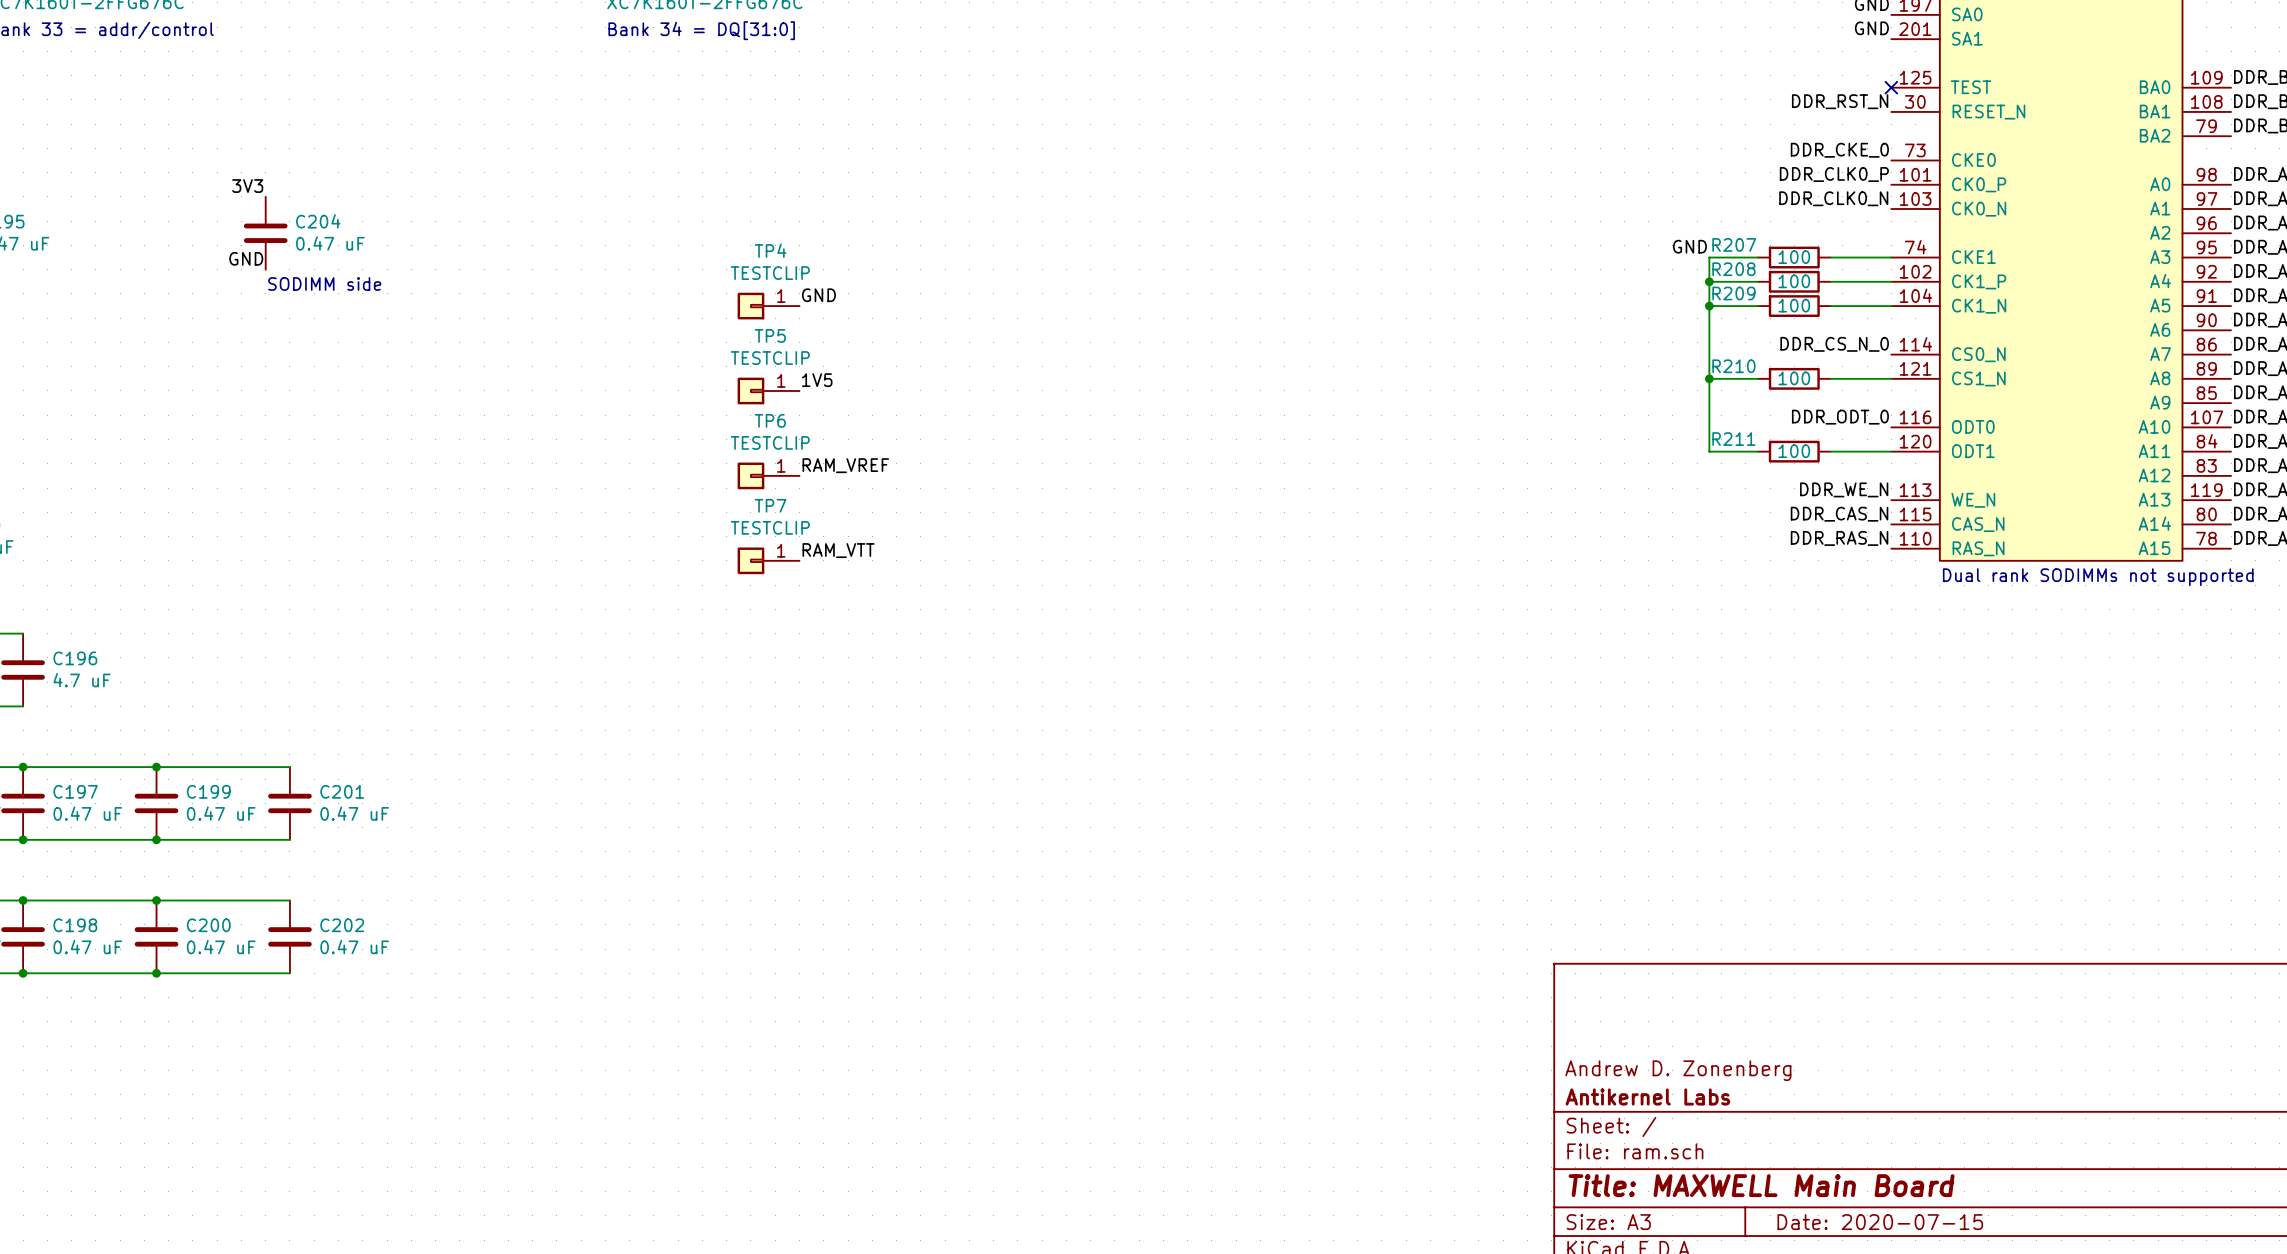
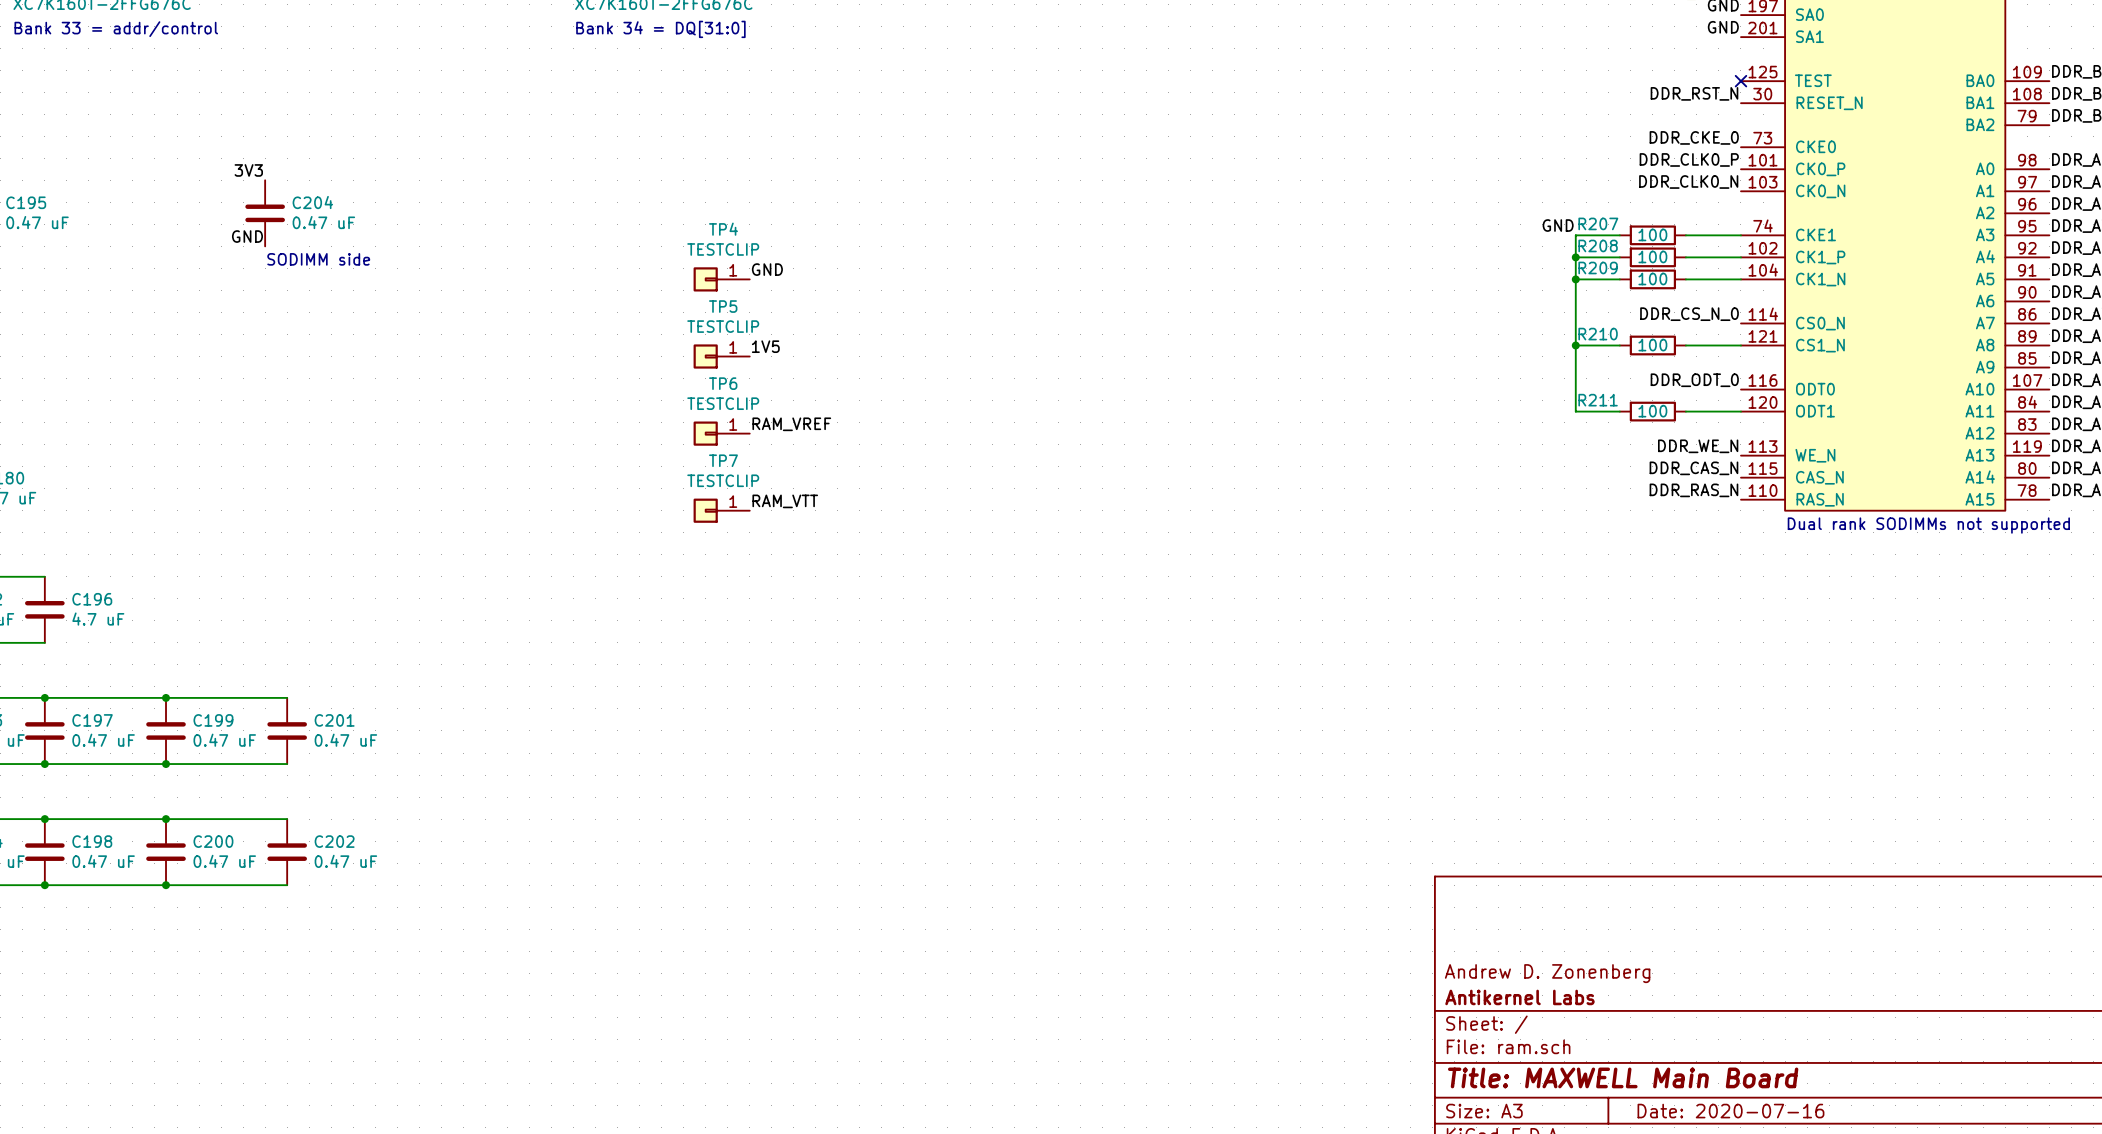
title block: Date: 2020-07-15 (1880, 1222) -> Date: 2020-07-16 (1730, 1111)

